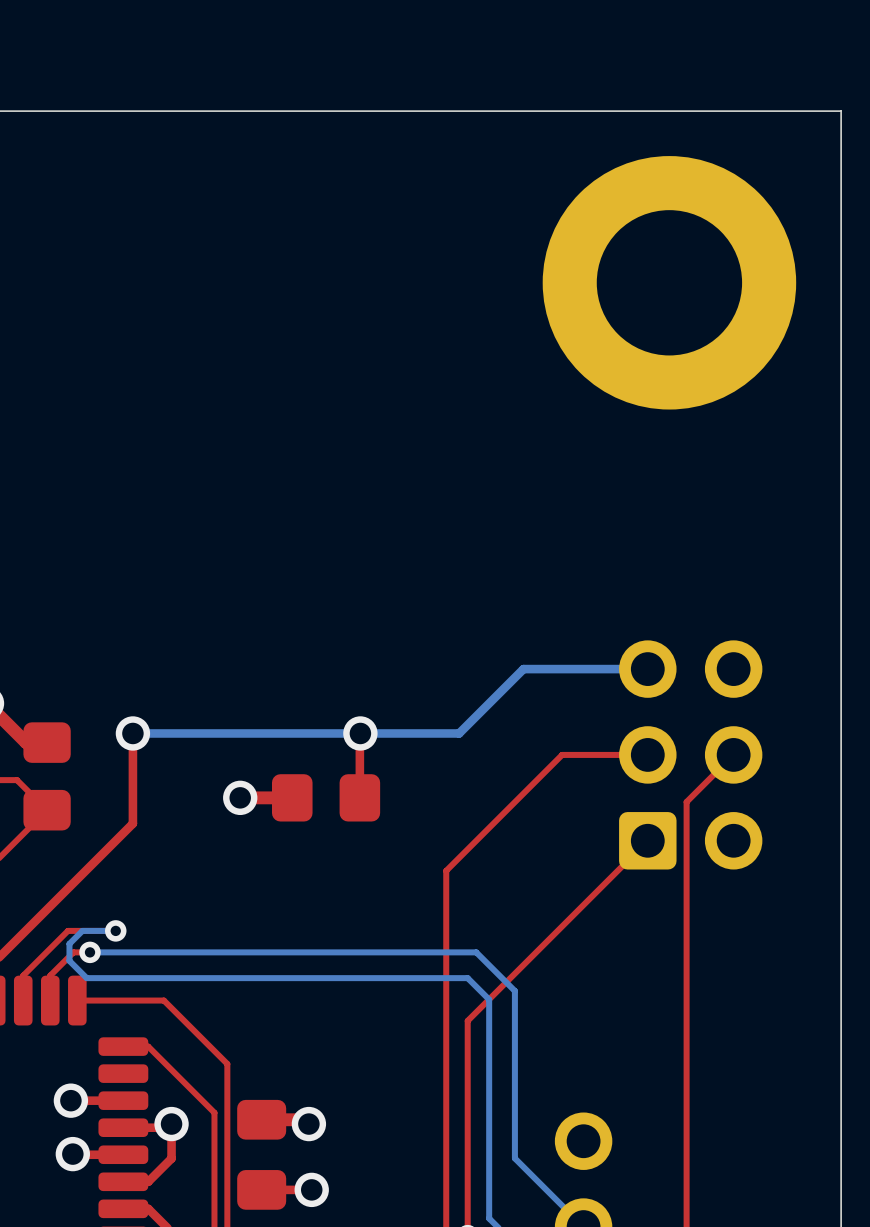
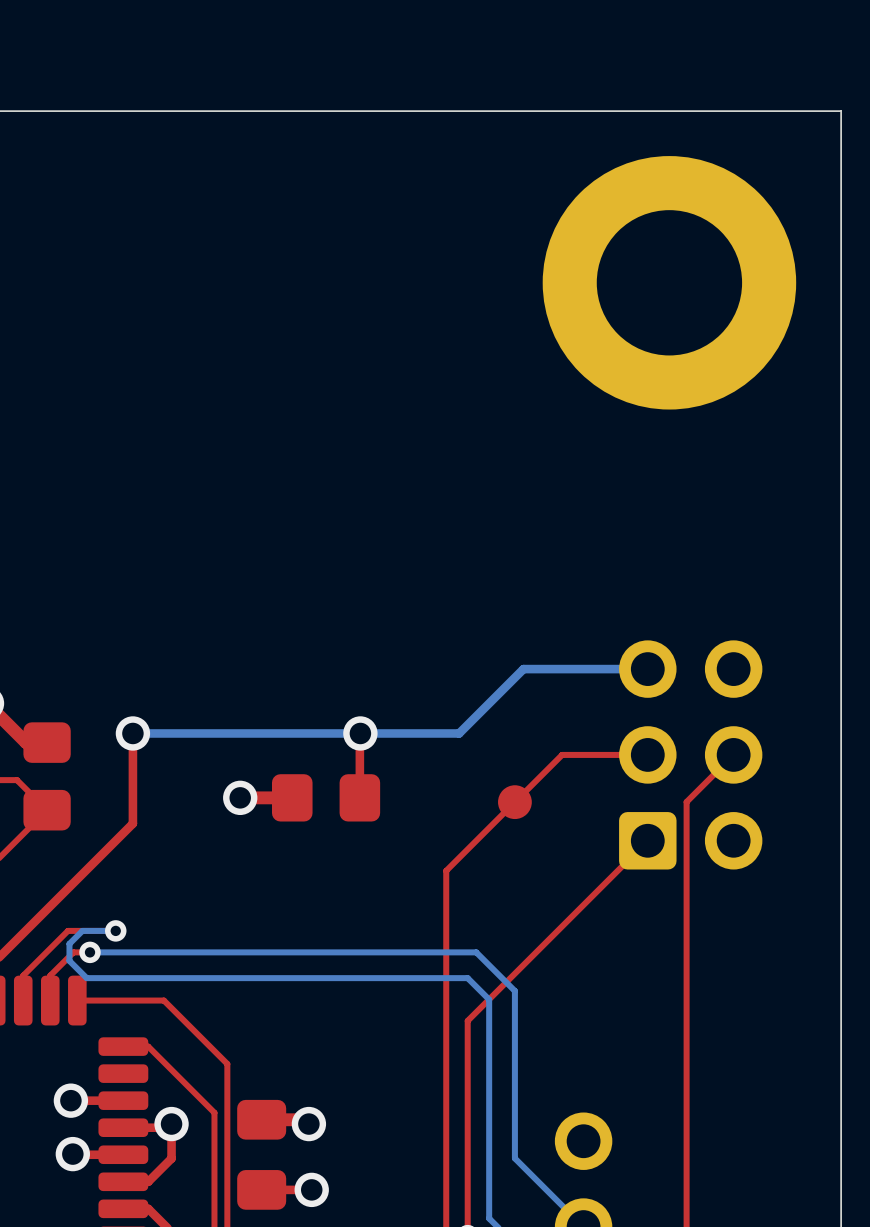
part: none -> (514, 802)

